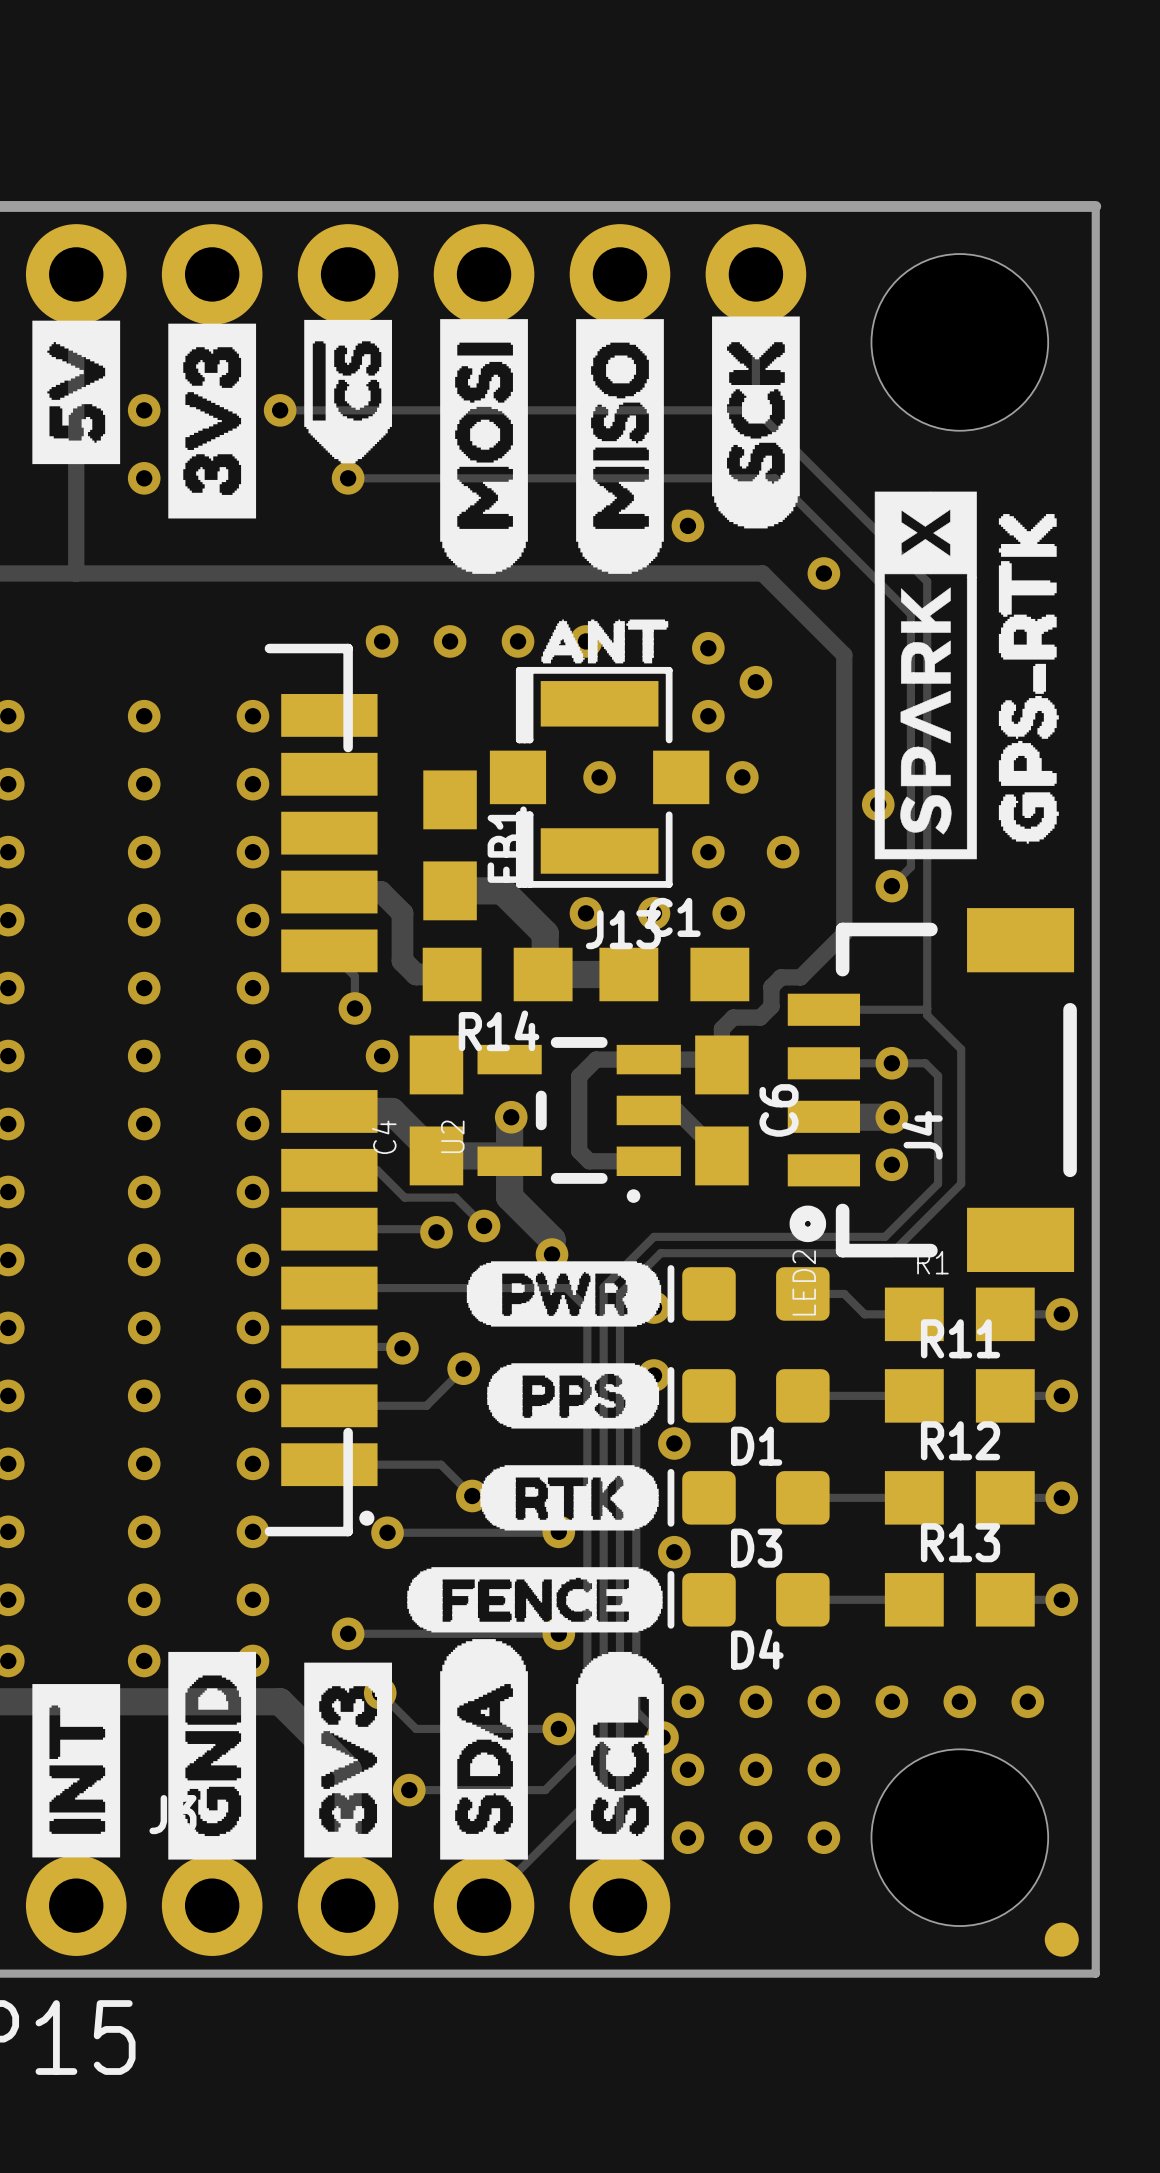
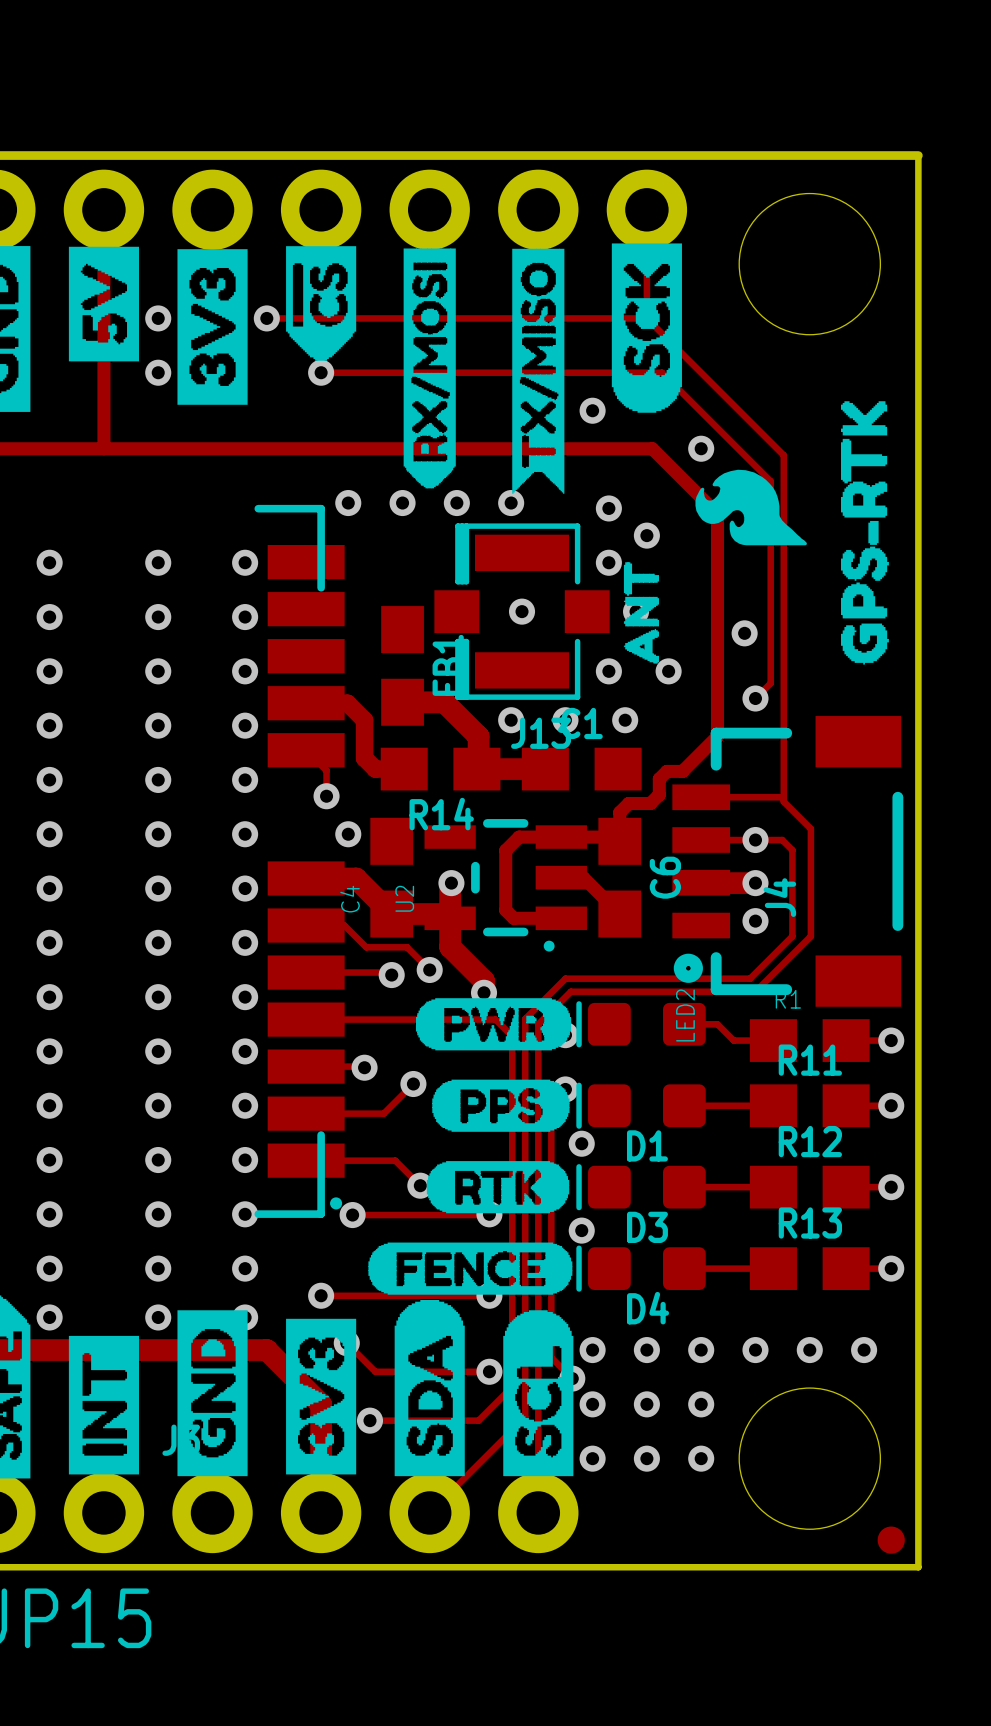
drawing shape: [440, 319, 528, 574] -> [403, 248, 456, 489]
drawing shape: [576, 319, 664, 574] -> [512, 248, 565, 494]
drawing shape: [874, 491, 977, 860] -> [695, 469, 807, 546]
drawing: [541, 619, 669, 664] -> none
drawing: none -> [623, 562, 660, 664]

